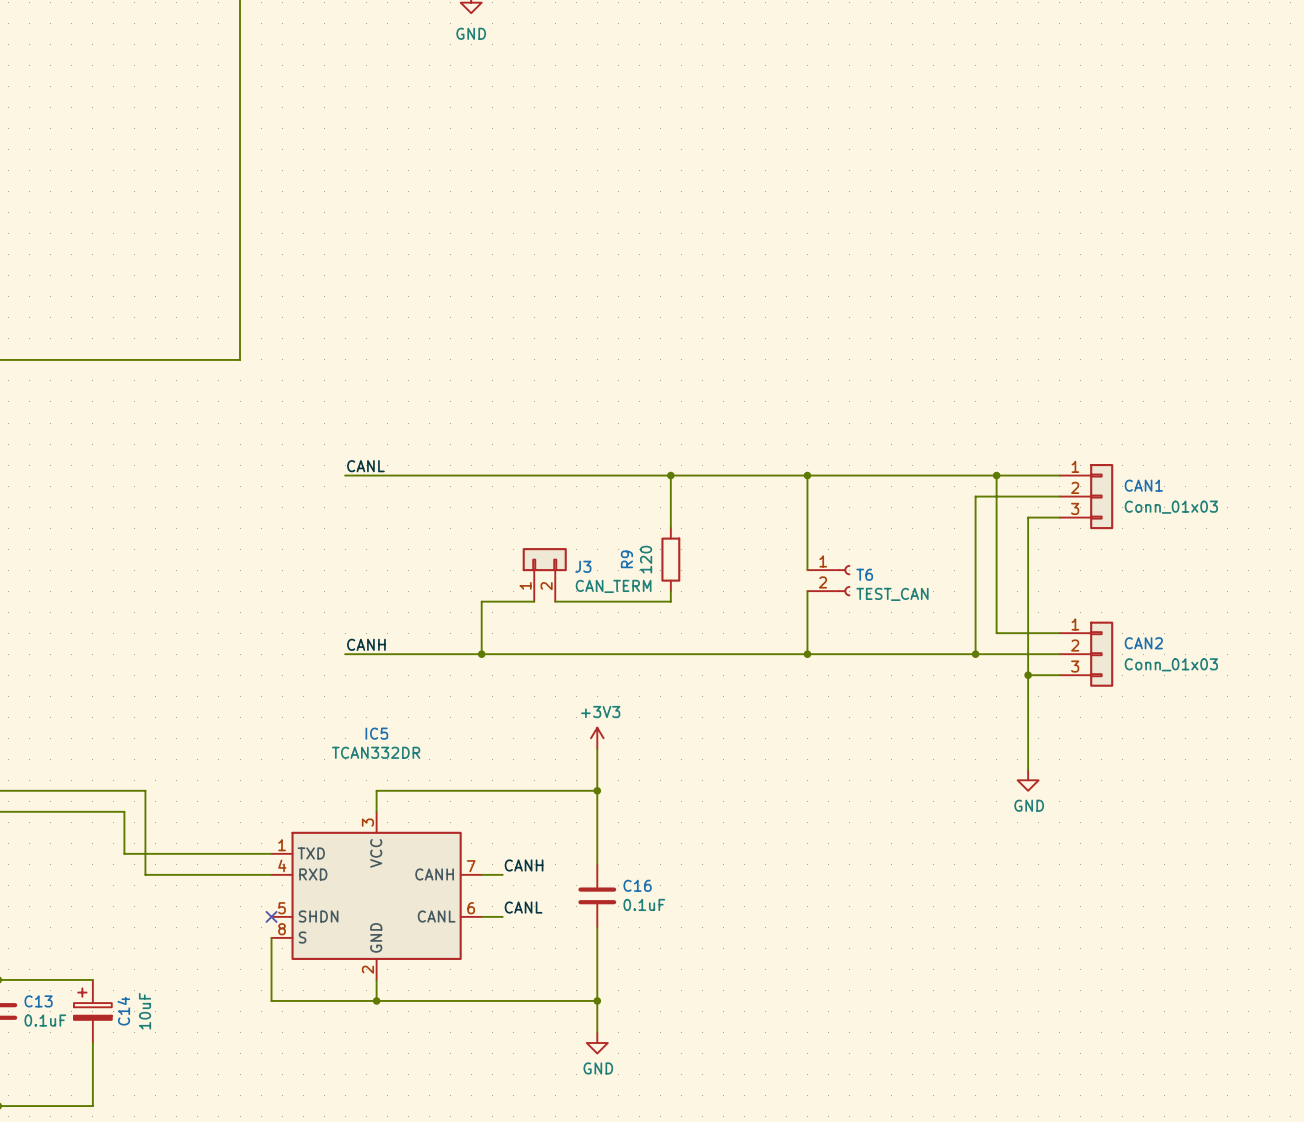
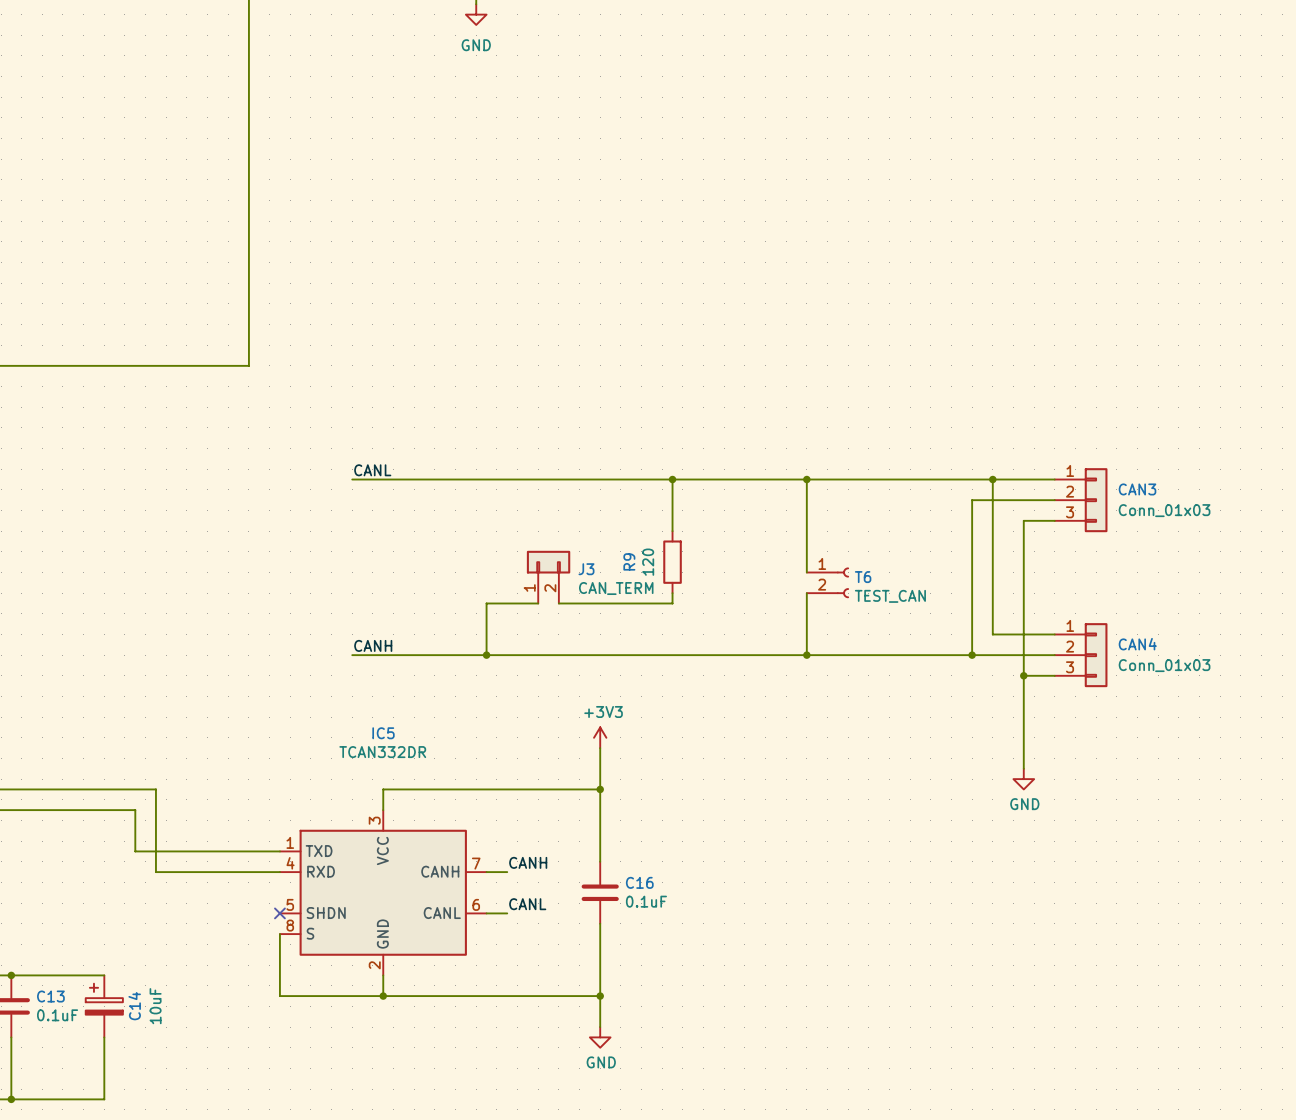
CAN1 name: CAN1 (1143, 485) -> CAN3 (1137, 489)
CAN2 name: CAN2 (1143, 643) -> CAN4 (1137, 644)

